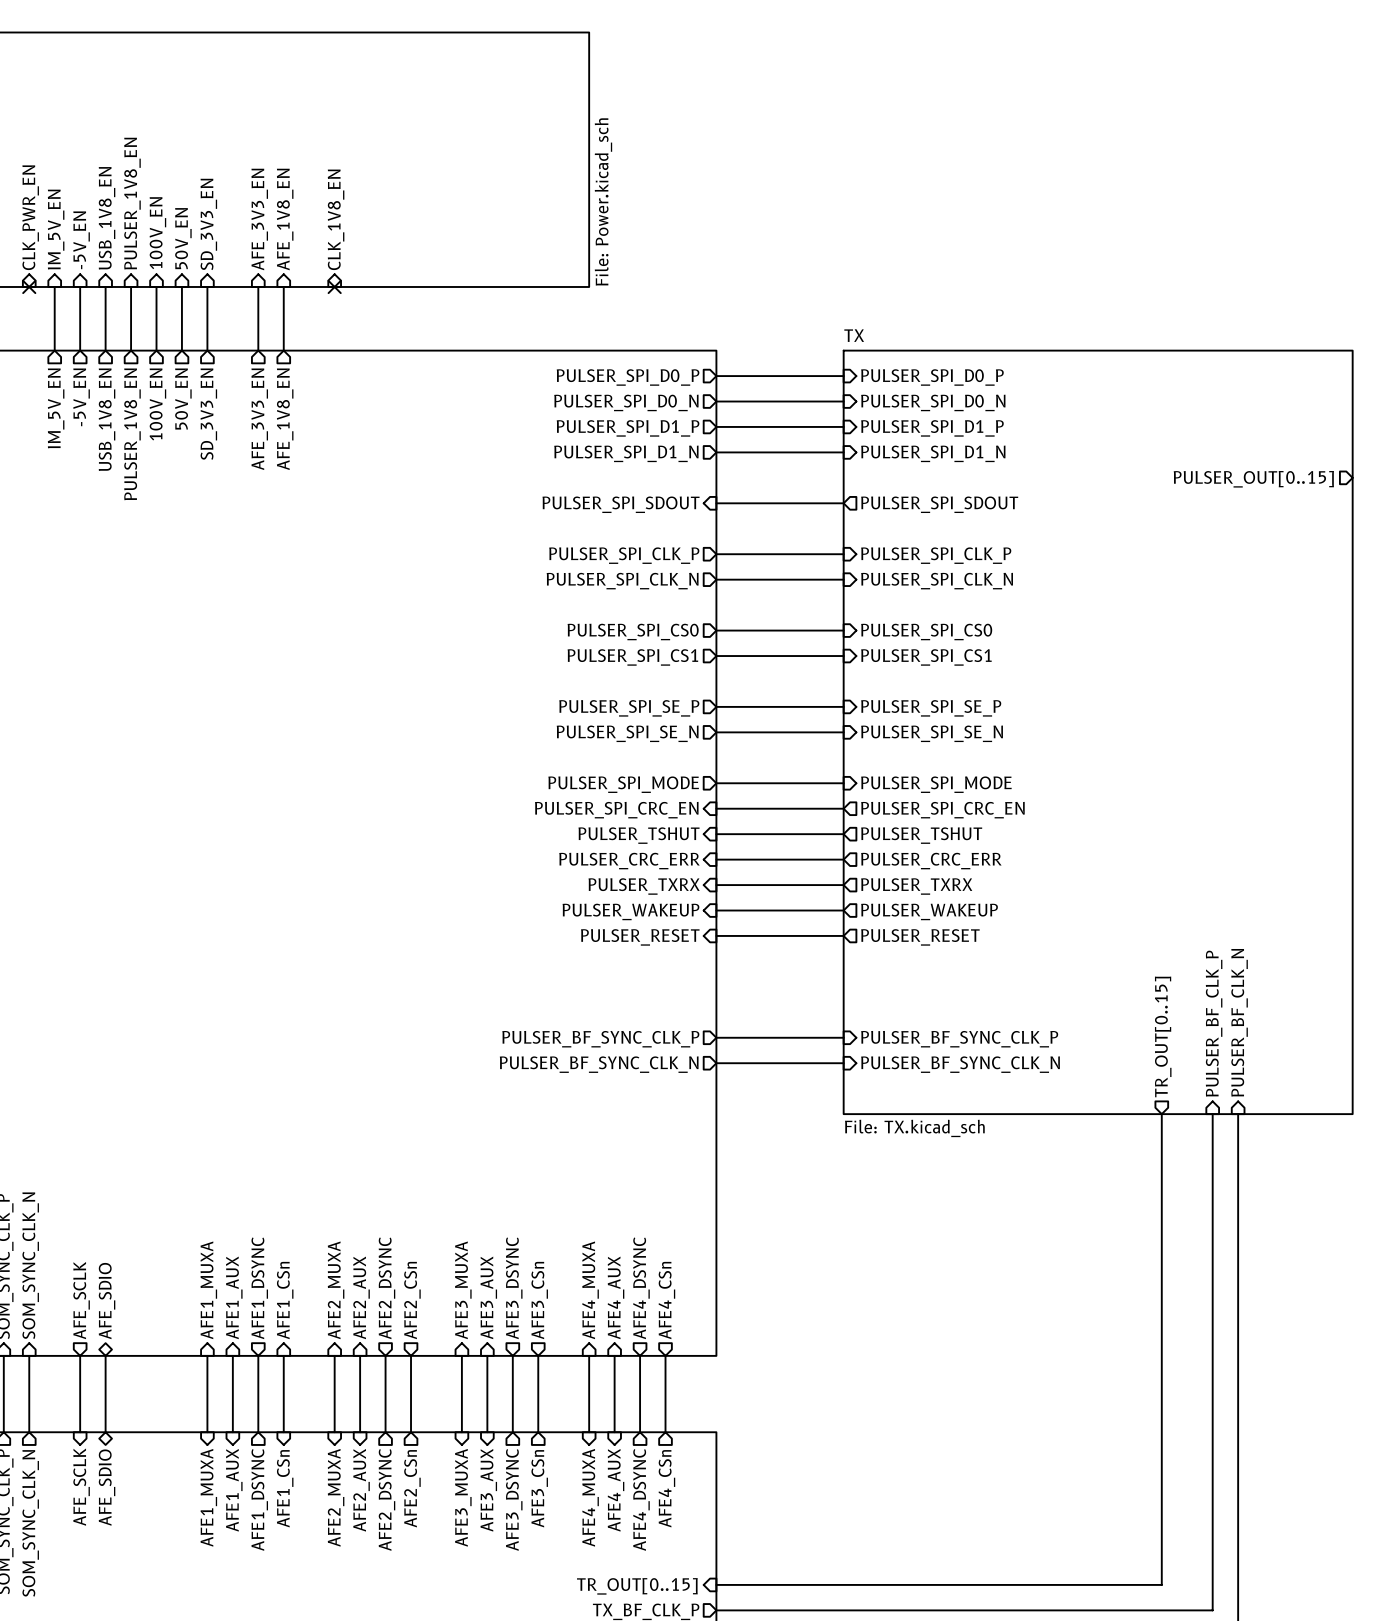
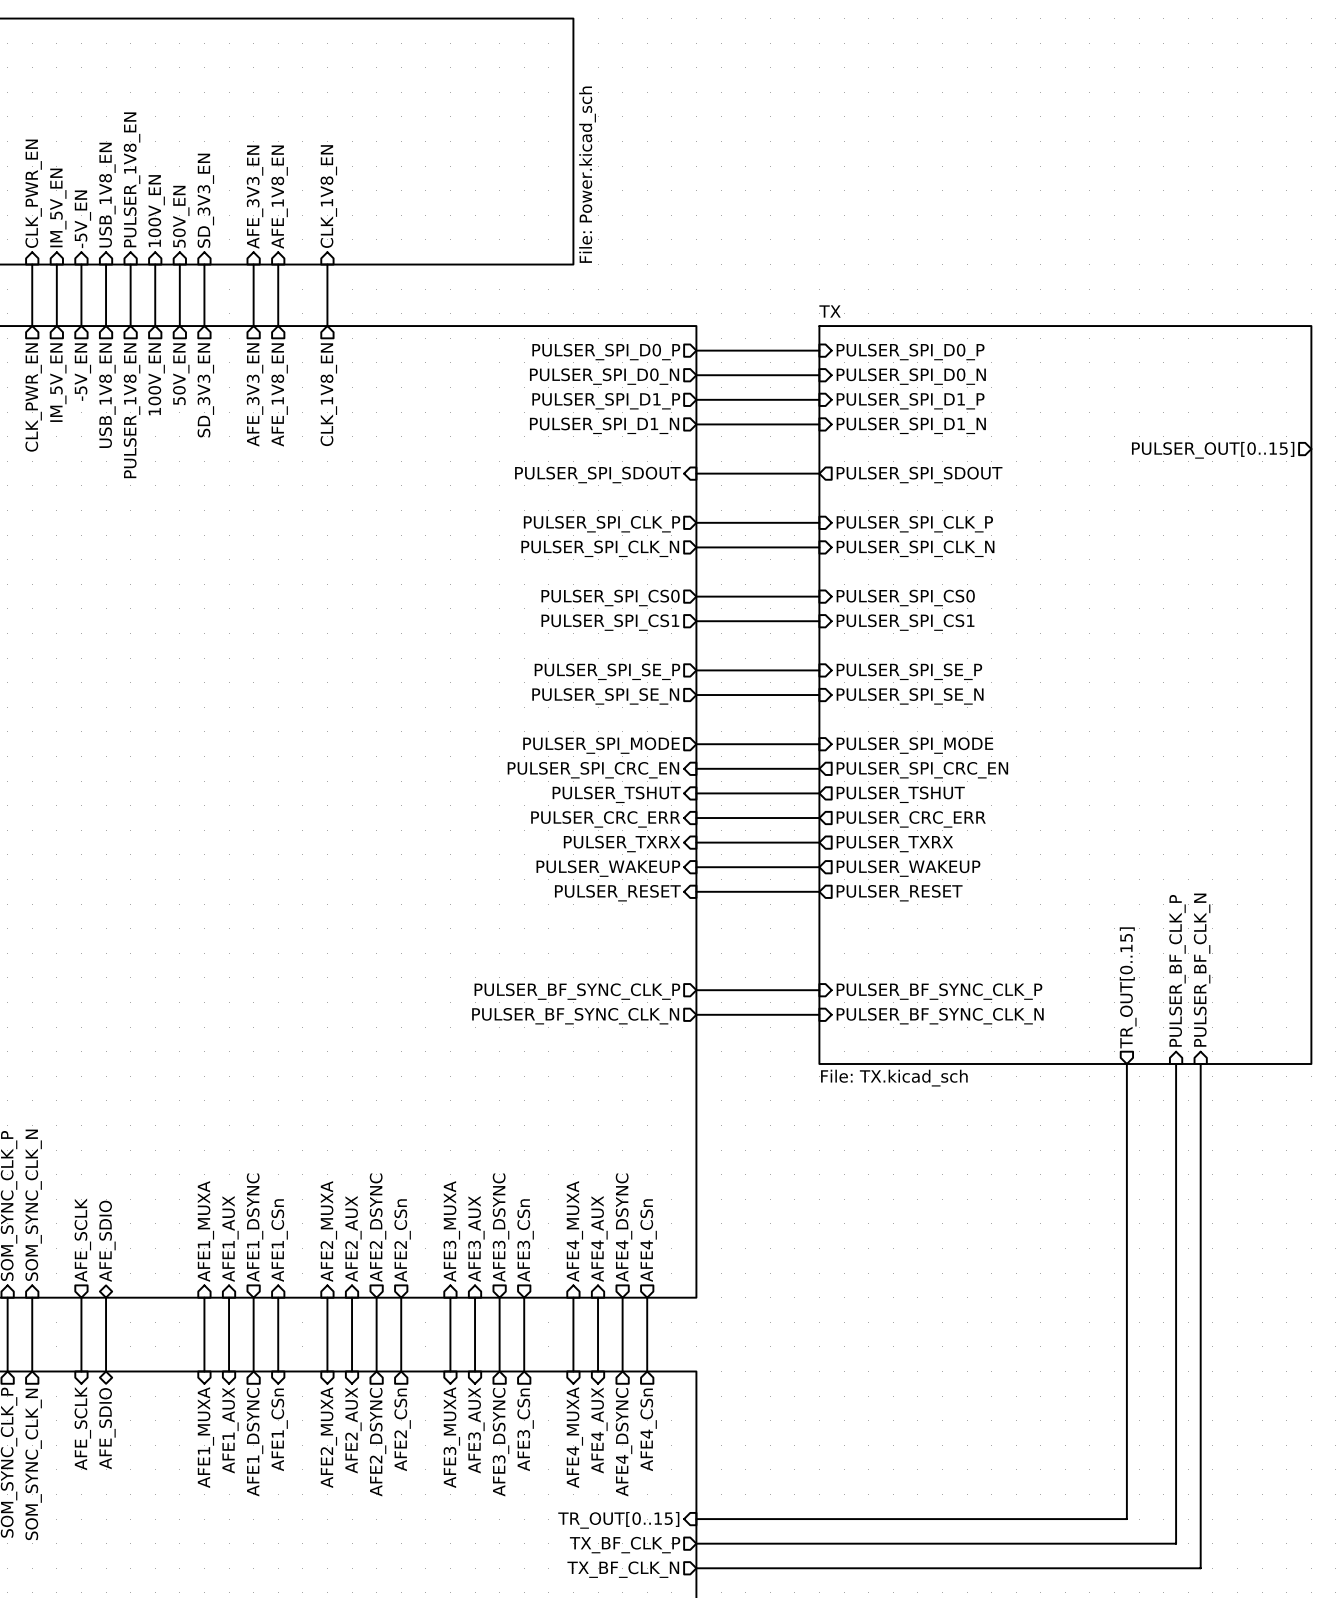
wire: none -> (32, 264) (32, 326)
no-connect mark: (29, 286) -> none
wire: none -> (327, 264) (327, 326)
no-connect mark: (334, 286) -> none
sheet pin: none -> CLK_1V8_EN (328, 394)
sheet pin: none -> CLK_PWR_EN (33, 397)

